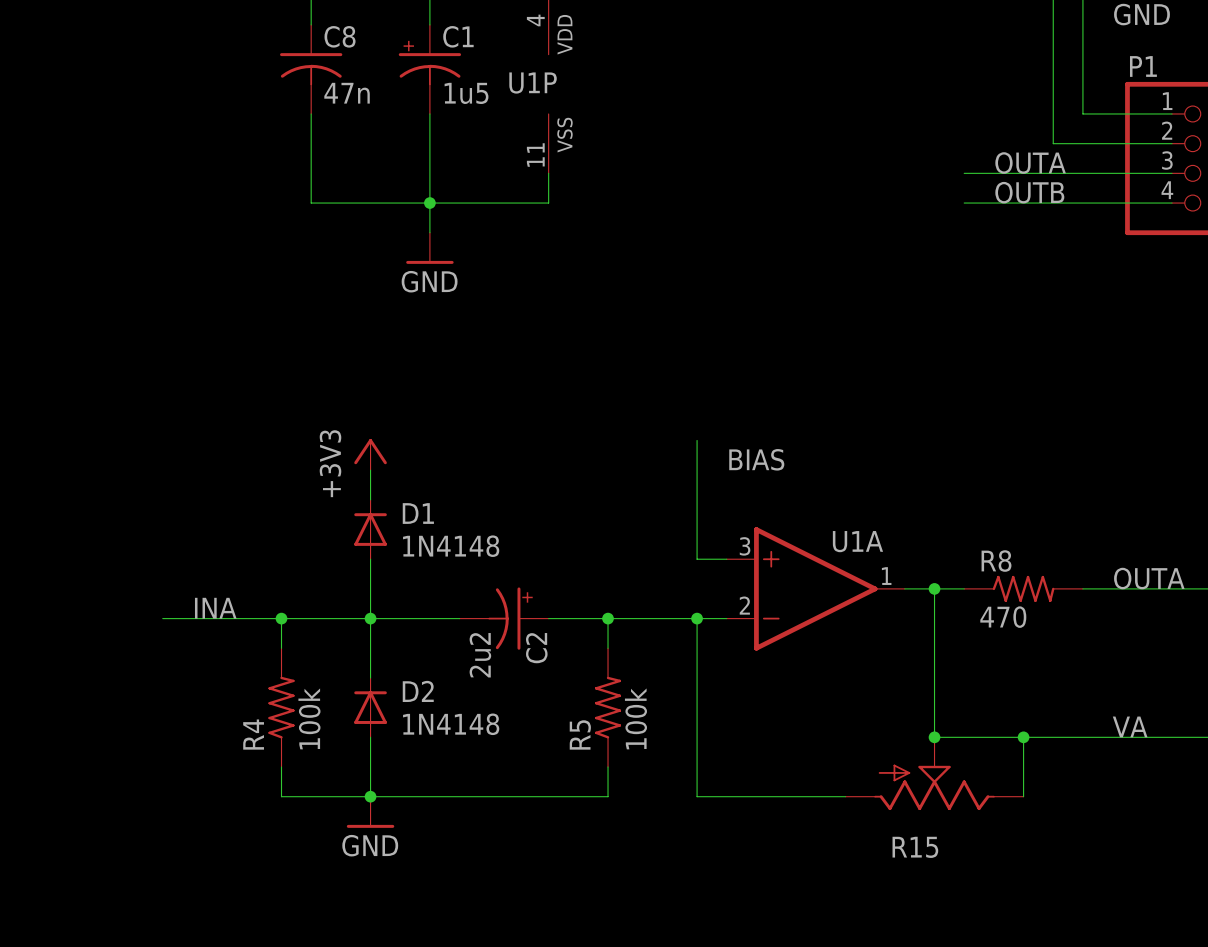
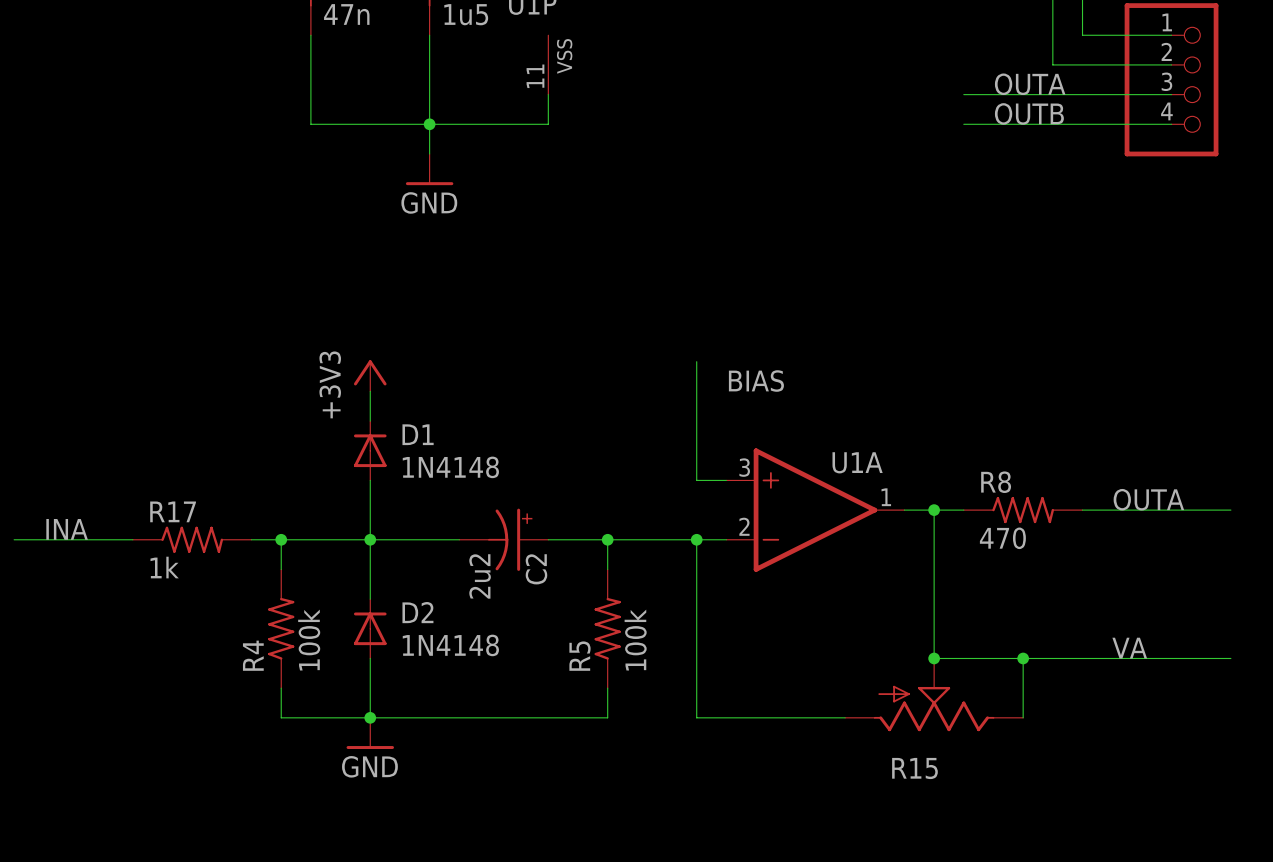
label position: INA (215, 608) -> INA (67, 529)
wire: none -> (14, 539) (132, 539)
R17: none -> 1k (192, 539)

